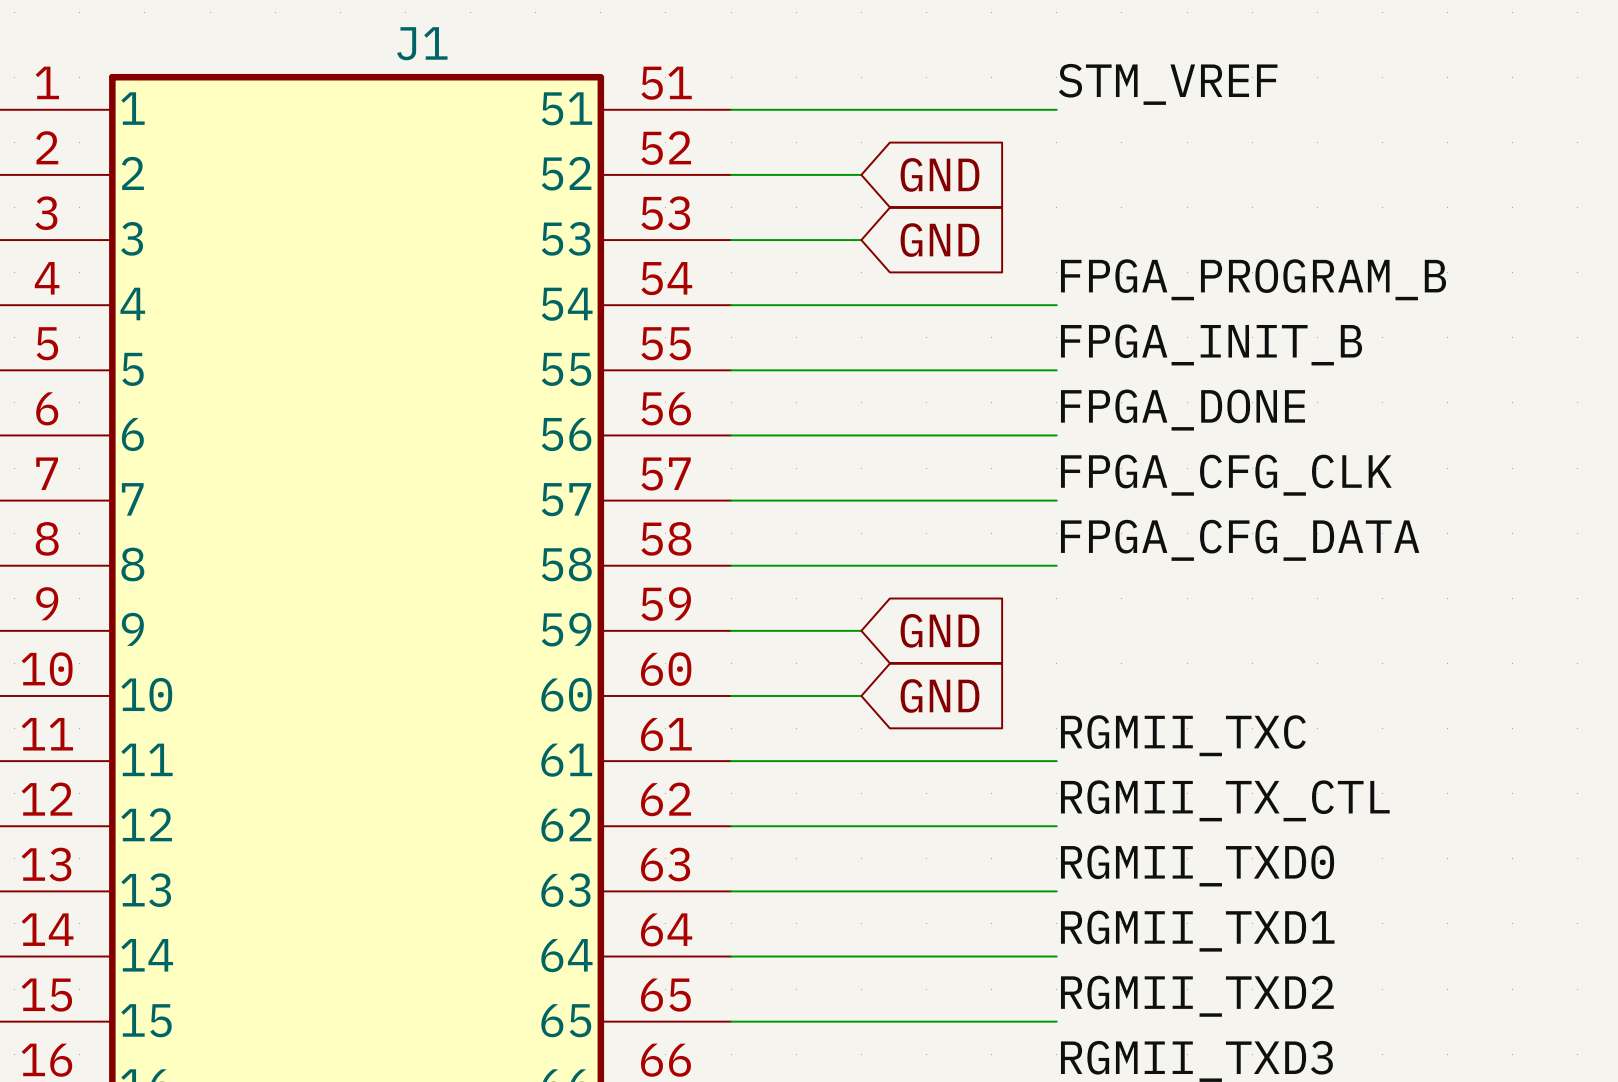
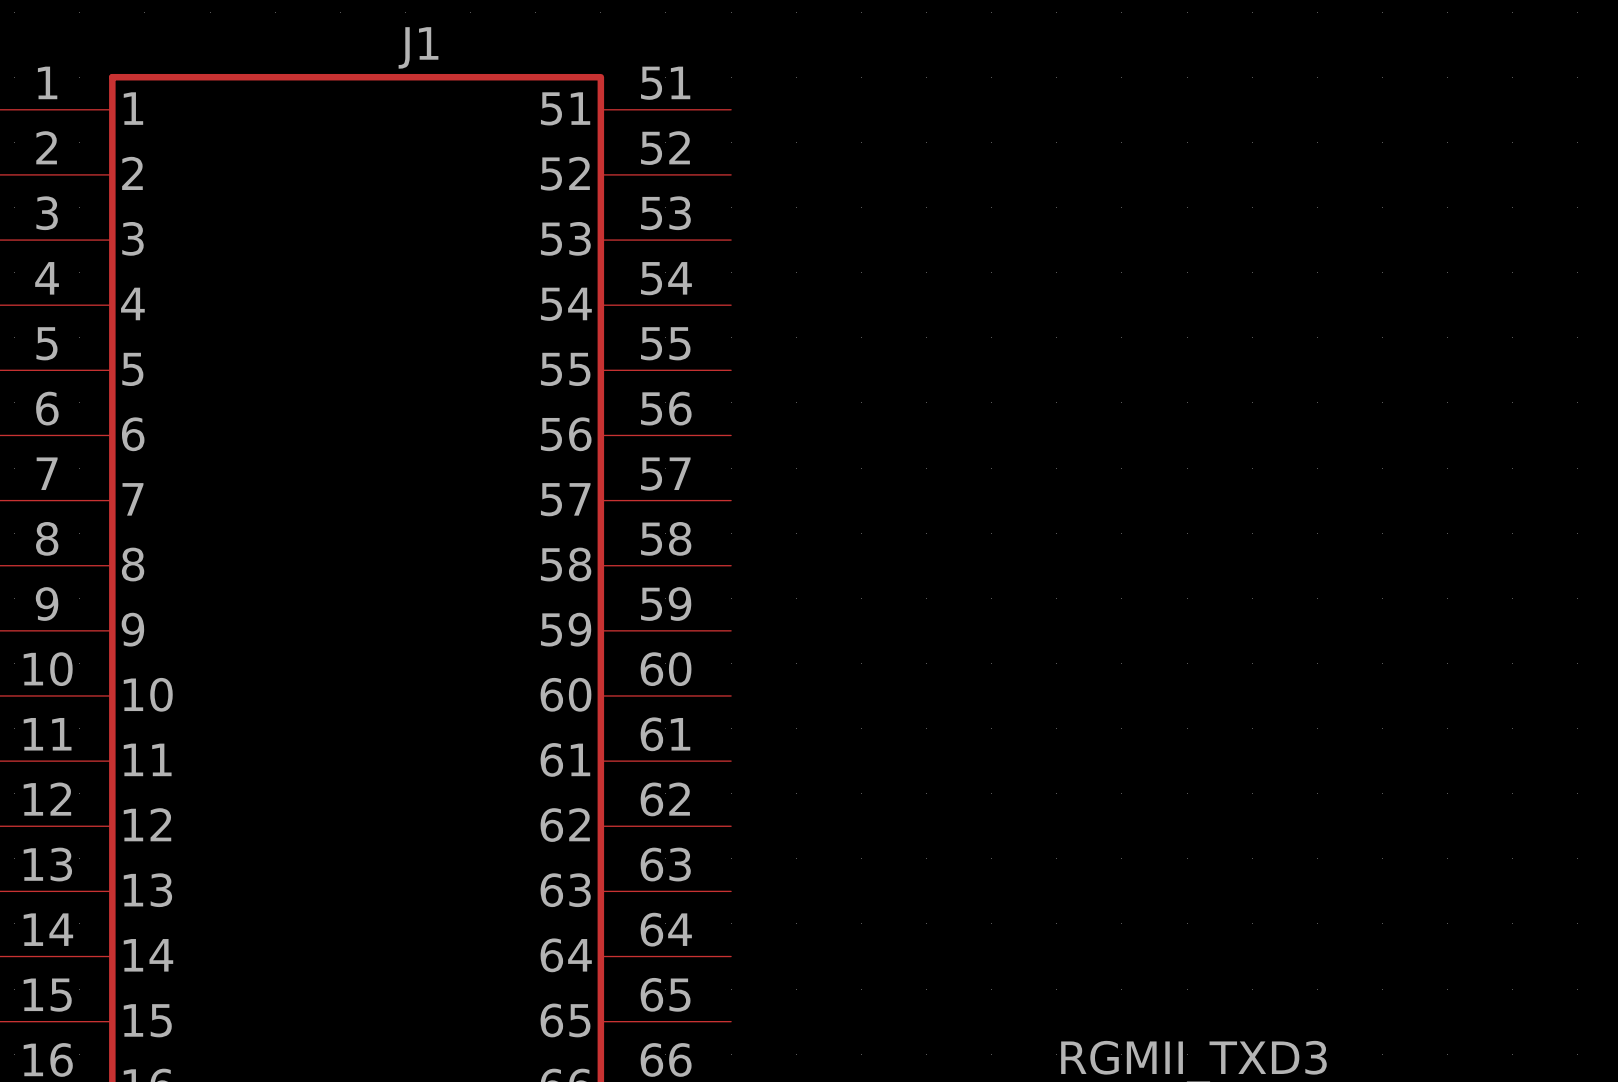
label: STM_VREF (1168, 84) -> none
wire: (731, 109) (1056, 109) -> none
wire: (731, 174) (861, 174) -> none
global label: GND (940, 174) -> none
wire: (731, 240) (861, 240) -> none
global label: GND (940, 240) -> none
label: FPGA_PROGRAM_B (1253, 279) -> none
wire: (731, 305) (1056, 305) -> none
label: FPGA_INIT_B (1211, 344) -> none
wire: (731, 370) (1056, 370) -> none
label: FPGA_DONE (1182, 410) -> none
wire: (731, 435) (1056, 435) -> none
label: FPGA_CFG_CLK (1226, 475) -> none
wire: (731, 500) (1056, 500) -> none
label: FPGA_CFG_DATA (1240, 540) -> none
wire: (731, 565) (1056, 565) -> none
wire: (731, 630) (861, 630) -> none
global label: GND (940, 630) -> none
wire: (731, 695) (861, 695) -> none
global label: GND (940, 695) -> none
label: RGMII_TXC (1183, 735) -> none
wire: (731, 761) (1056, 761) -> none
label: RGMII_TX_CTL (1225, 800) -> none
wire: (731, 826) (1056, 826) -> none
label: RGMII_TXD0 (1197, 865) -> none
wire: (731, 891) (1056, 891) -> none
label: RGMII_TXD1 (1197, 931) -> none
wire: (731, 956) (1056, 956) -> none
label: RGMII_TXD2 (1197, 996) -> none
wire: (731, 1021) (1056, 1021) -> none

